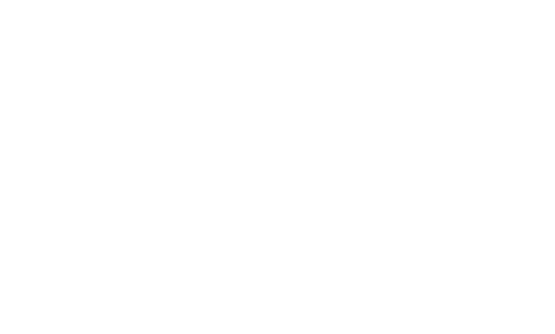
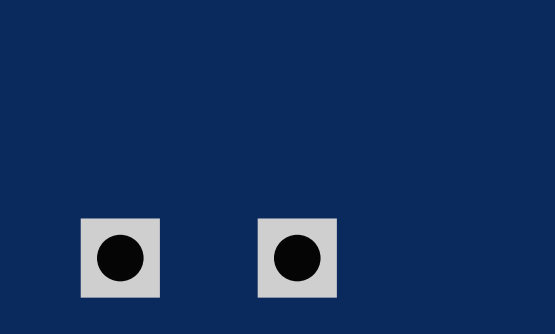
part: none -> (120, 258)
part: none -> (297, 258)

